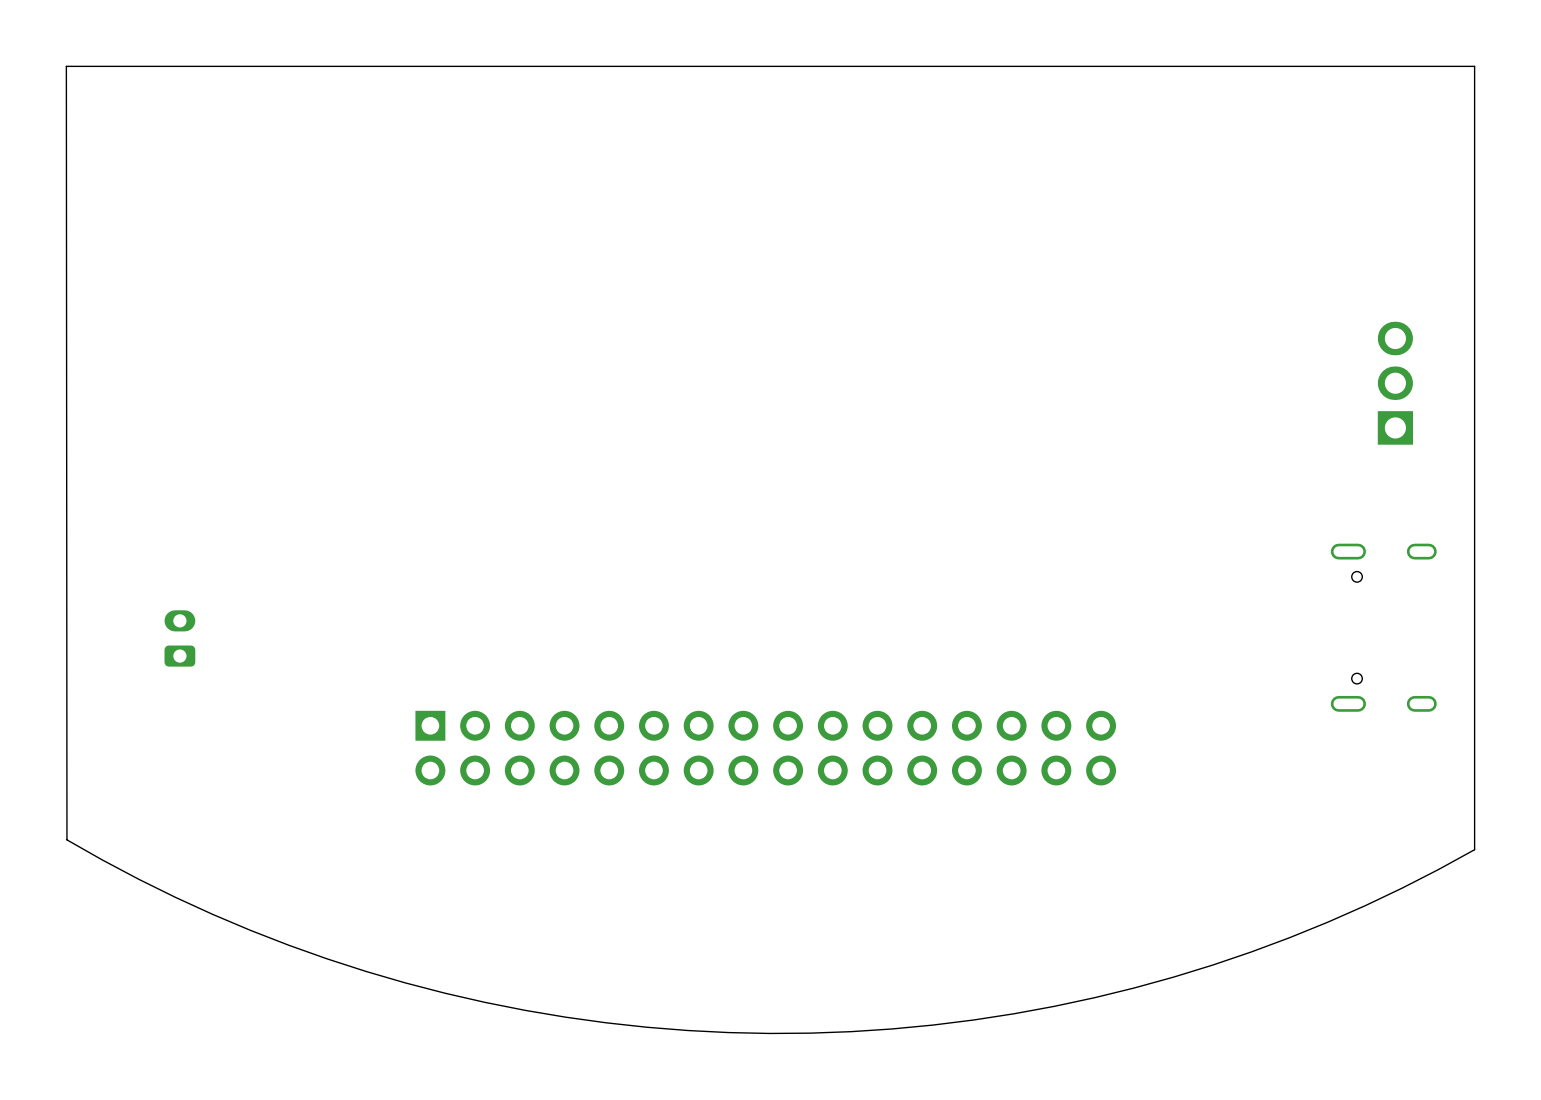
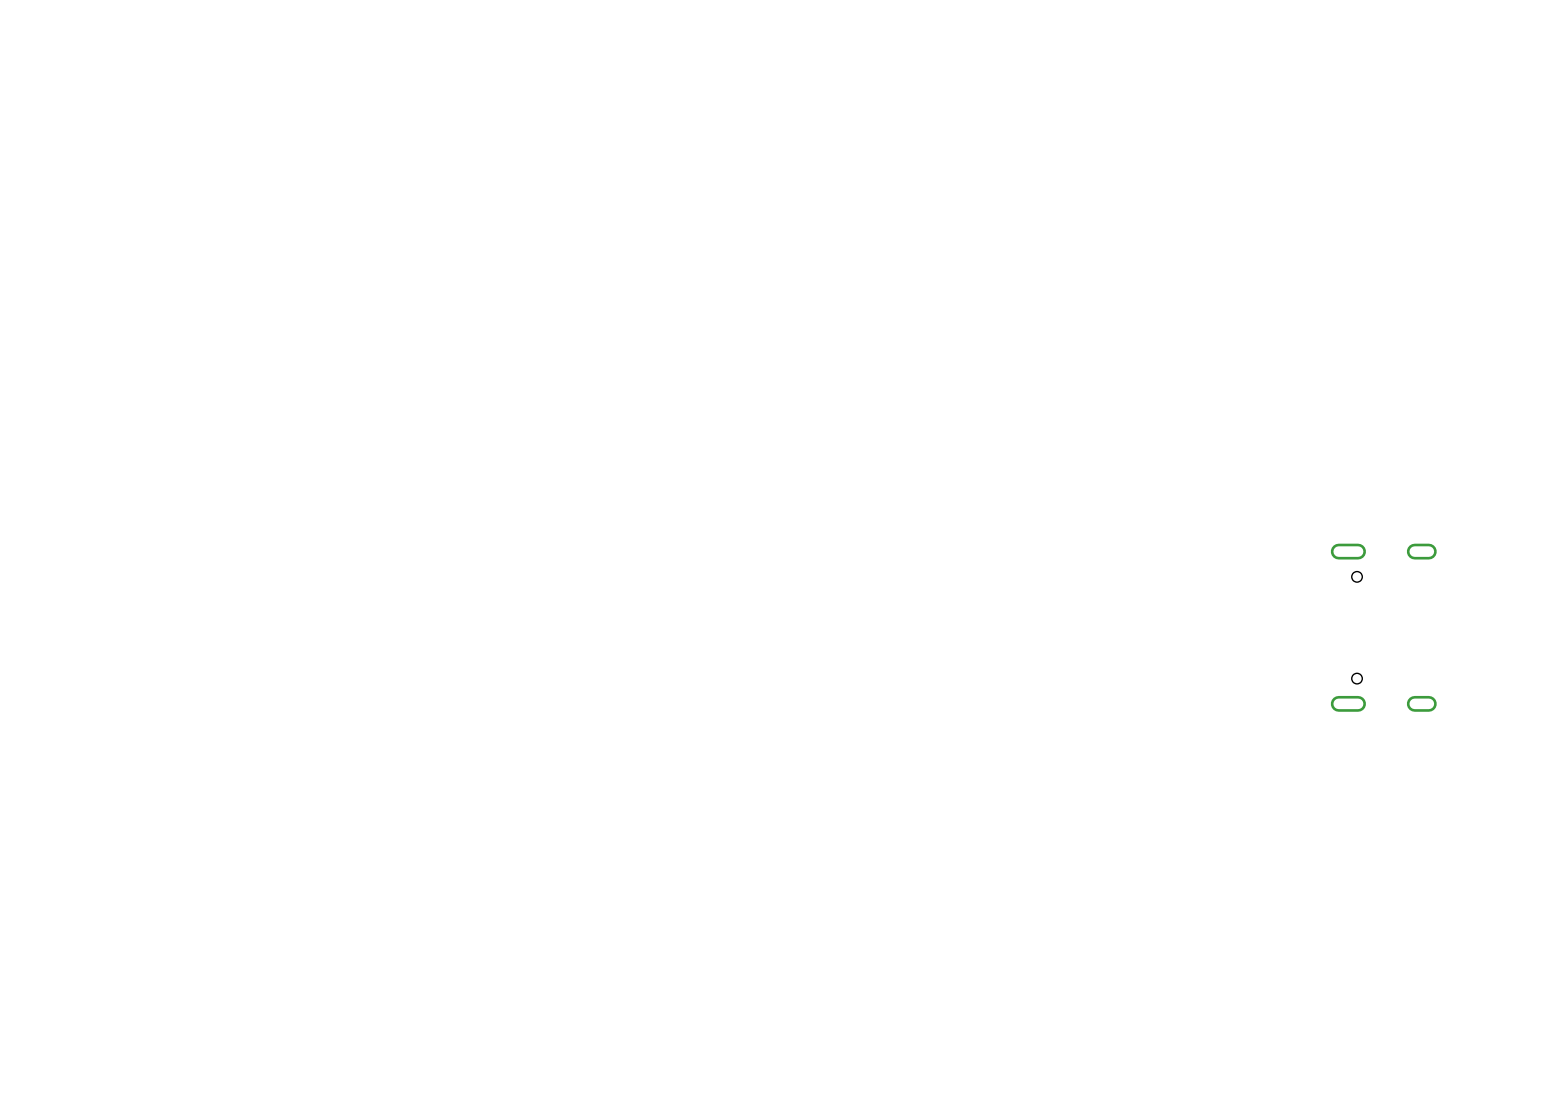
board edge: (1474, 66) (66, 66) (66, 839) (175, 897) (250, 930) (327, 958) (405, 982) (485, 1002) (565, 1017) (687, 1030) (769, 1033) (892, 1028) (973, 1020) (1054, 1006) (1134, 988) (1212, 965) (1327, 922) (1402, 888) (1474, 849) (1474, 66) -> none
part: (1395, 383) -> none
part: (179, 638) -> none
part: (765, 748) -> none

